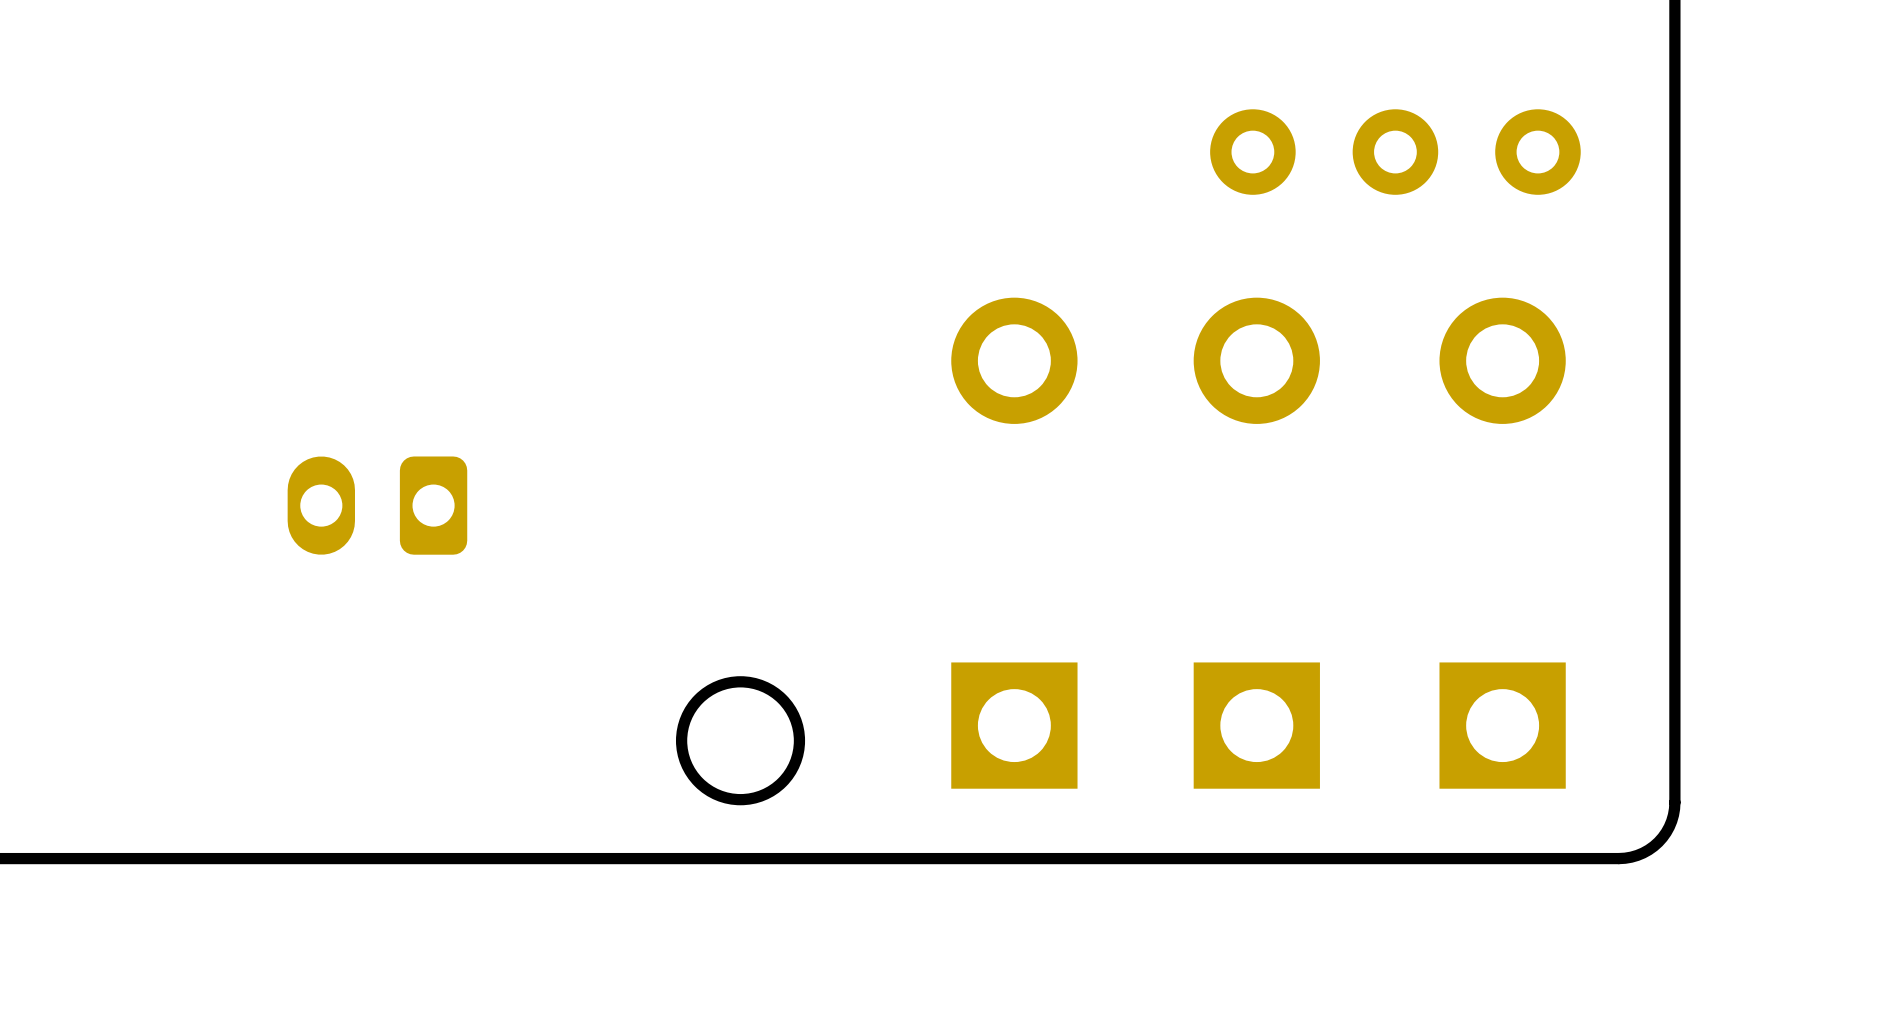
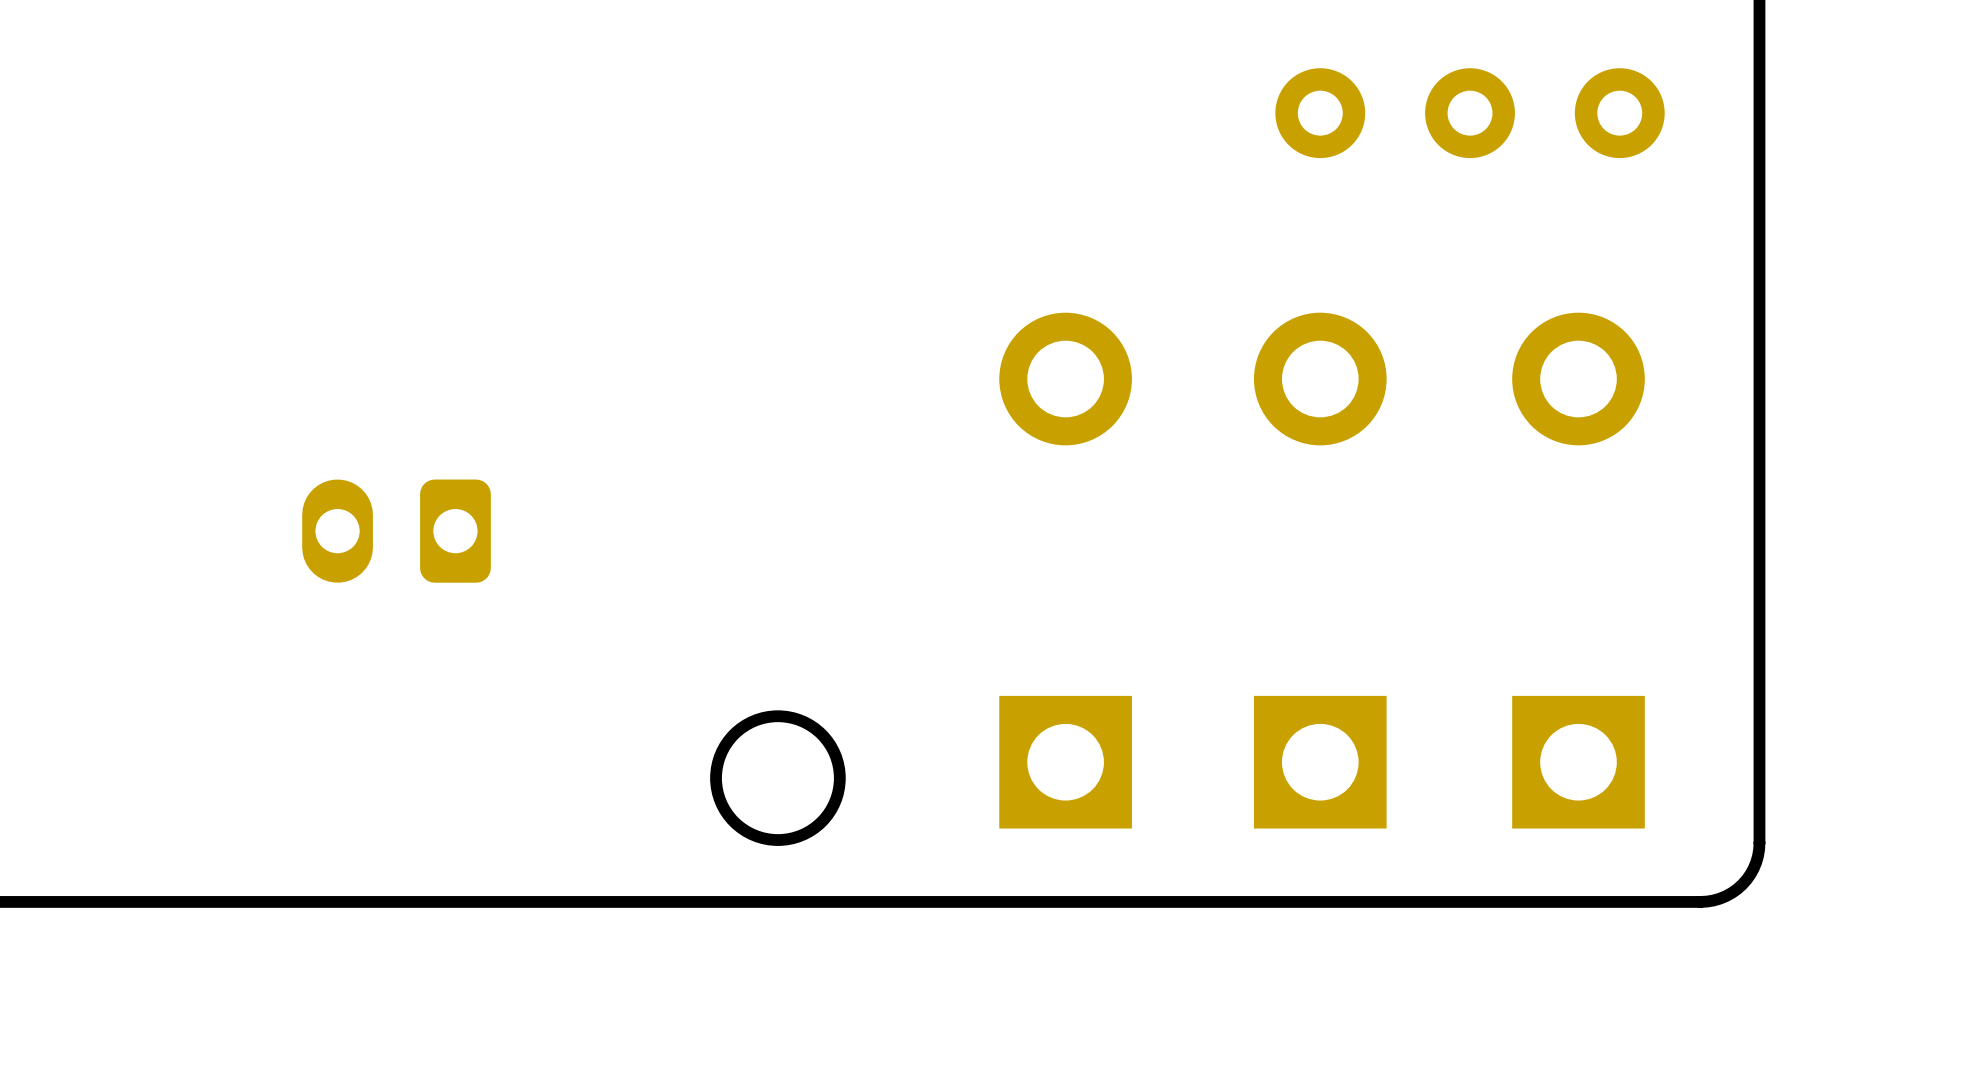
part position: (1395, 152) -> (1470, 113)

